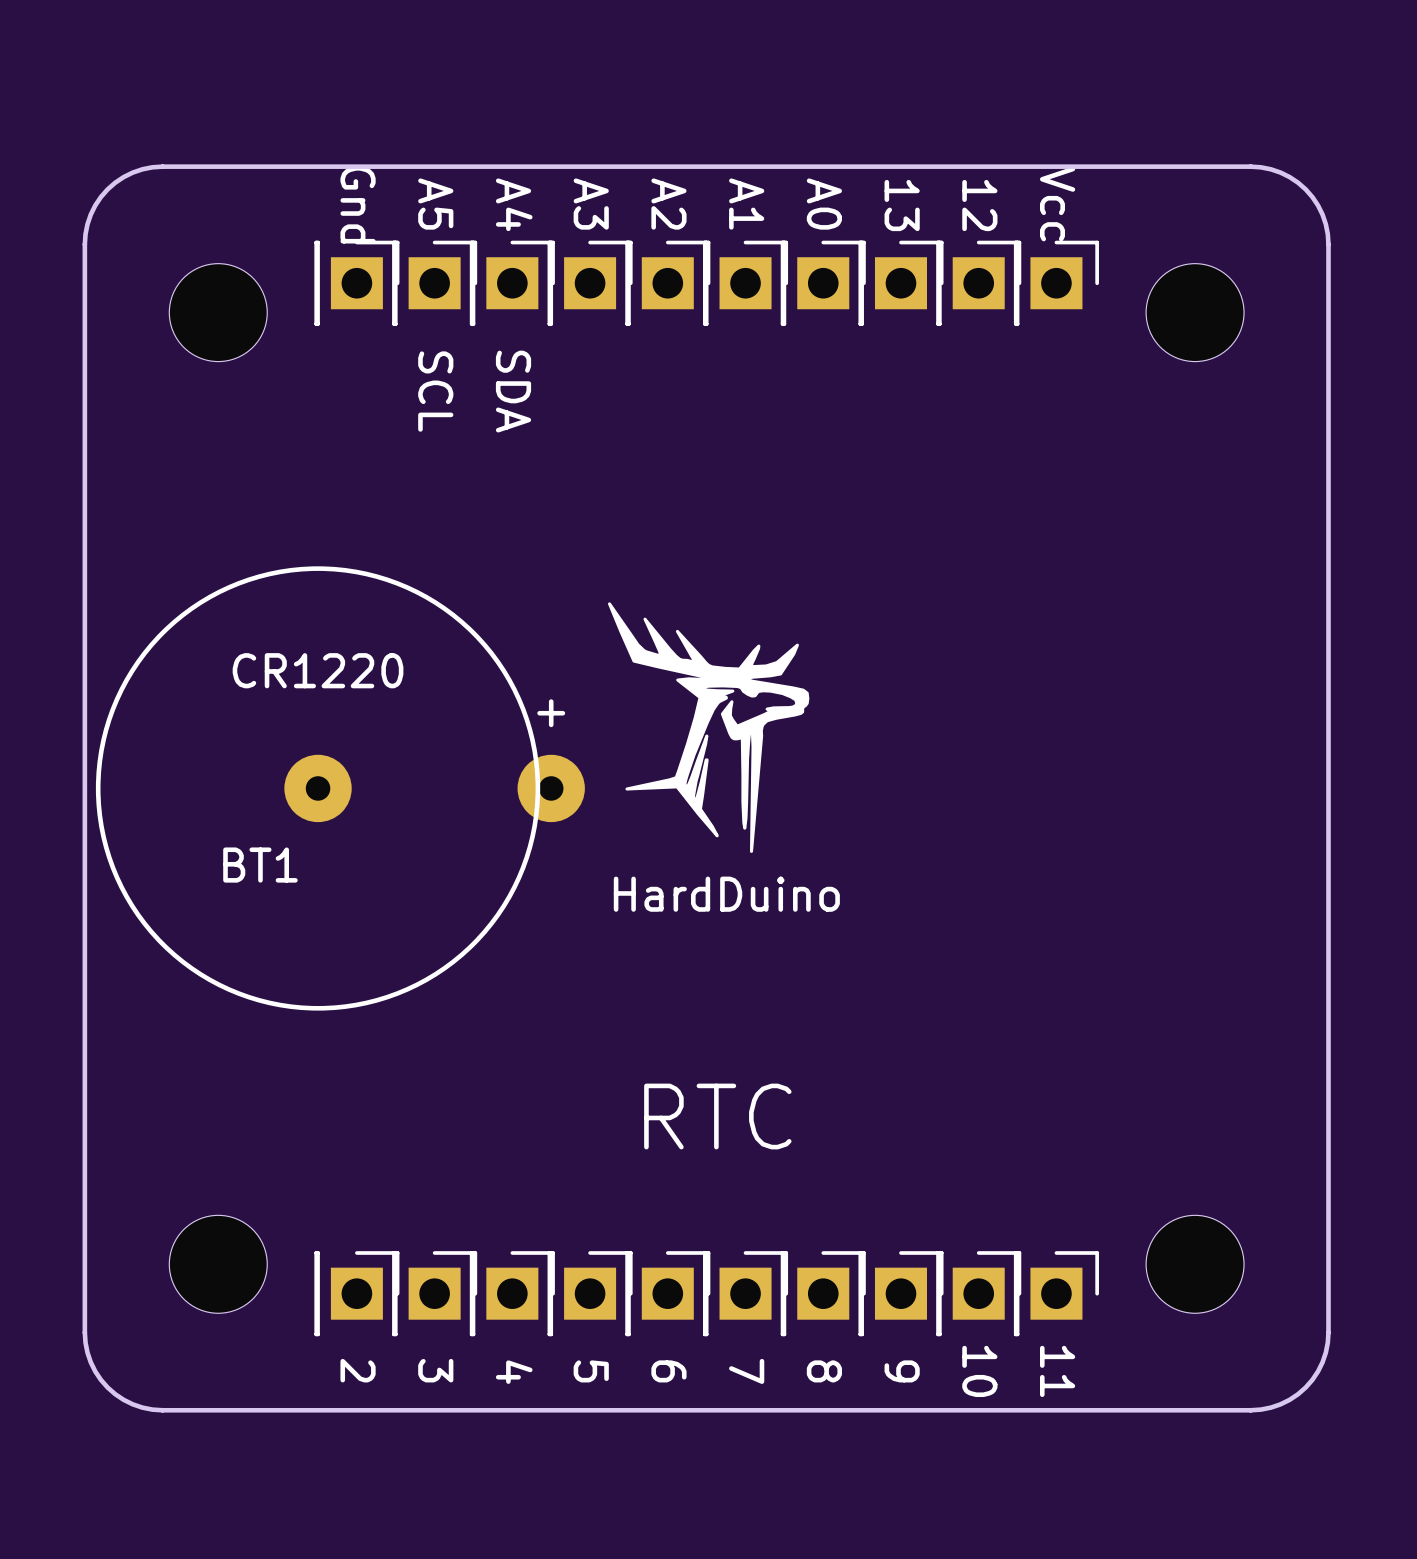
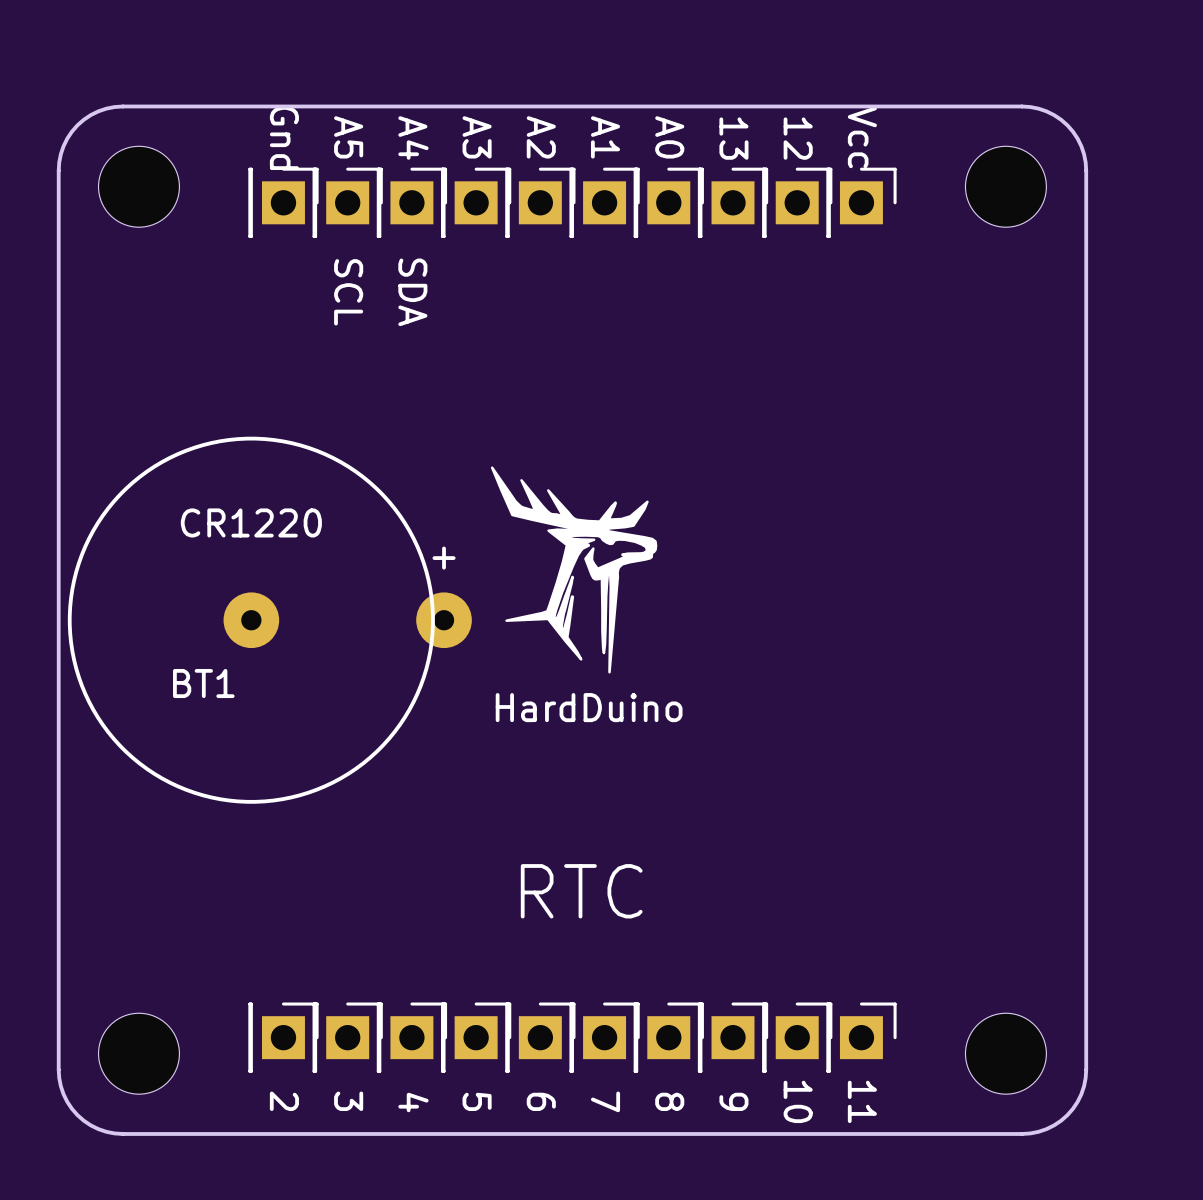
part position: (218, 312) -> (138, 186)
part position: (1195, 312) -> (1005, 186)
part position: (218, 1264) -> (138, 1053)
part position: (1195, 1264) -> (1005, 1053)

